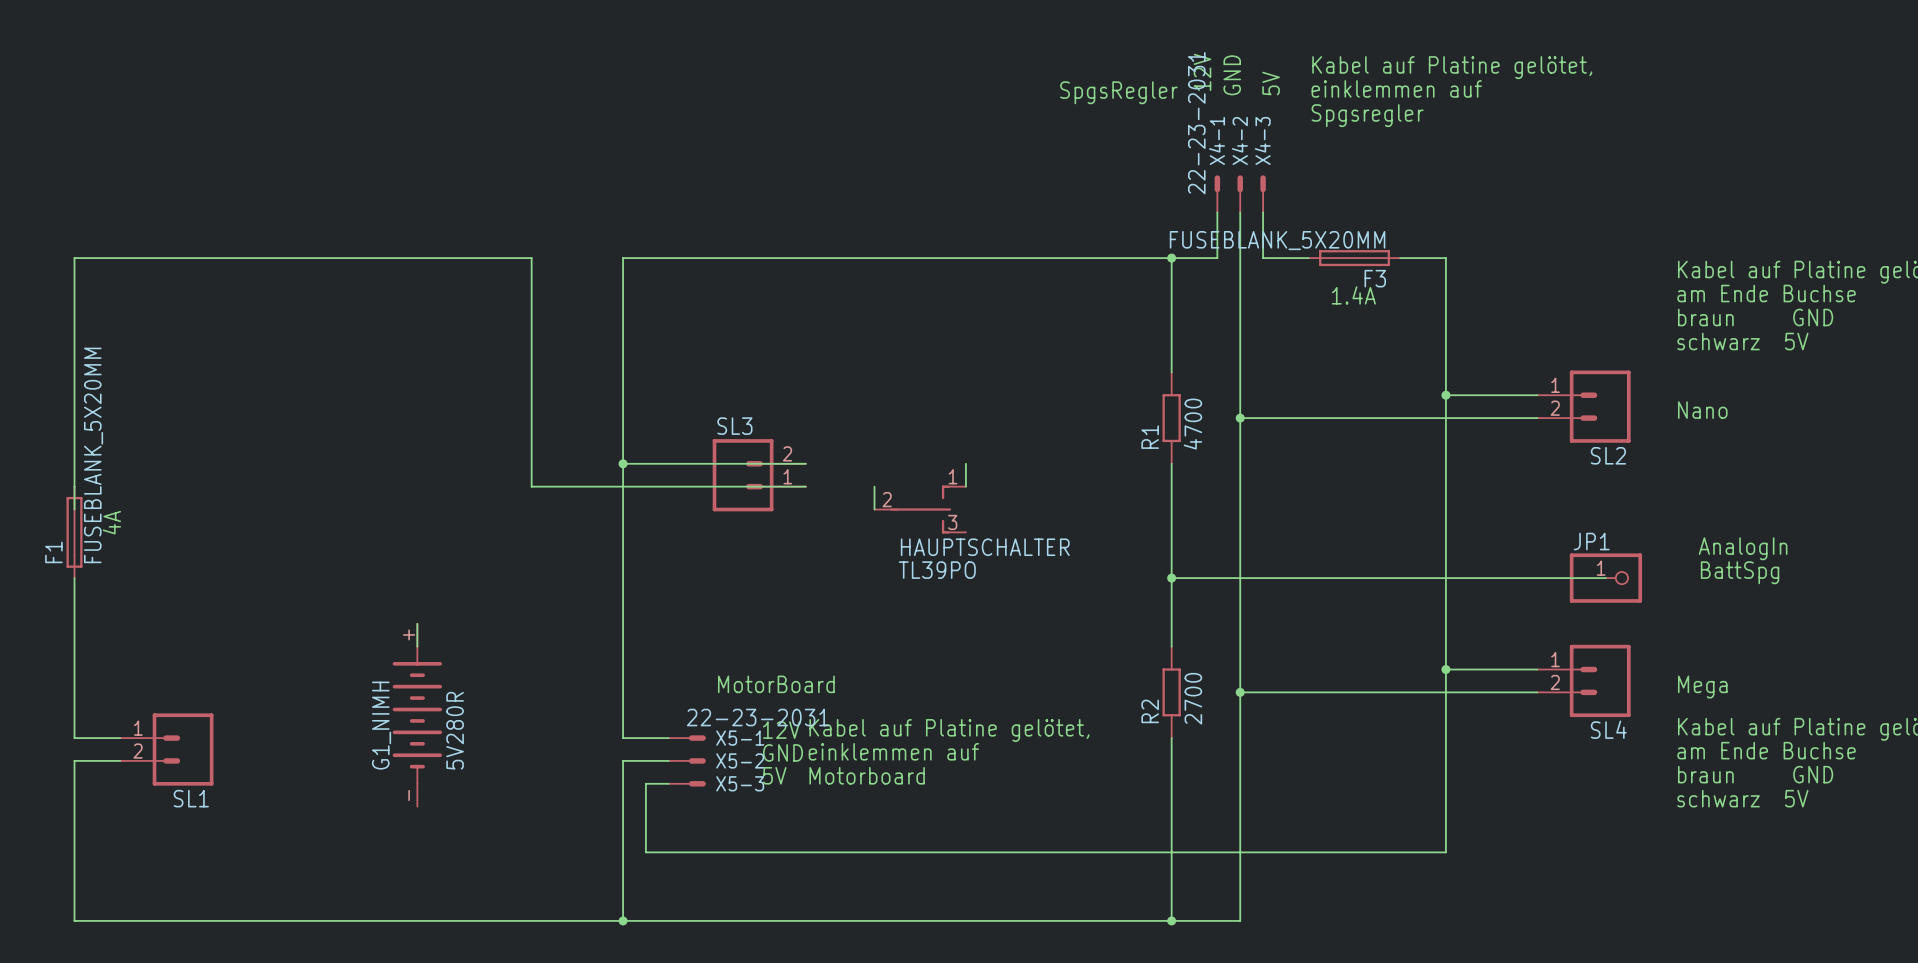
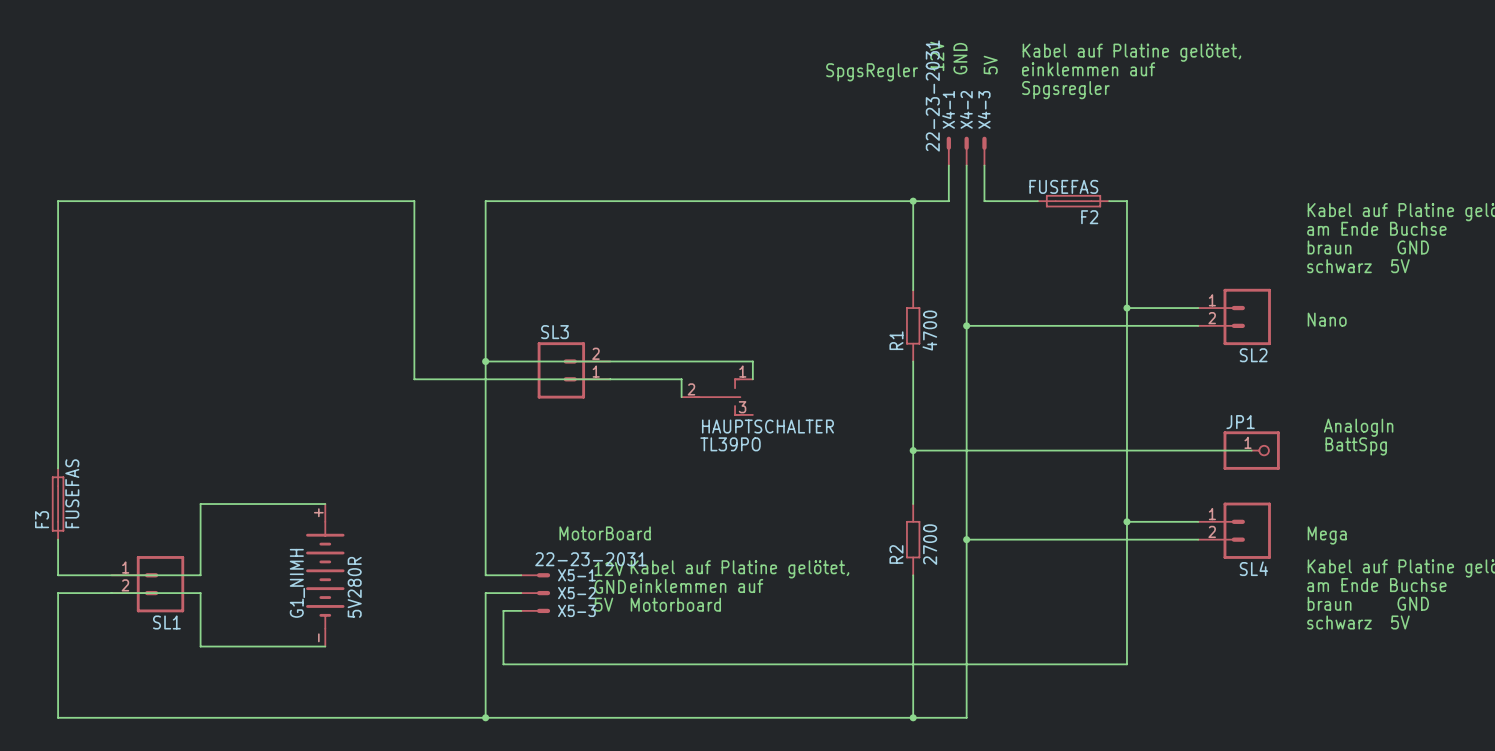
F3 value: FUSEBLANK_5X20MM (1277, 240) -> FUSEFAS (72, 493)
F3 rotation: 0° (1354, 258) -> 90° clockwise (58, 504)
F3 position: (1354, 258) -> (58, 504)
F2: none -> FUSEFAS (1073, 201)
text: 1.4A (1353, 295) -> none
wire: none -> (628, 361) (752, 361)
SL3 position: (759, 475) -> (574, 370)
wire: none -> (628, 379) (681, 379)
text: 4A (111, 522) -> none
F1: FUSEBLANK_5X20MM (74, 532) -> none
wire: (417, 623) (417, 646) -> (93, 575) (200, 575) (200, 504) (325, 504)
G1_NIMH position: (417, 715) -> (325, 575)
SL1 position: (166, 749) -> (147, 584)
wire: none -> (93, 593) (200, 593) (200, 646) (325, 646)

